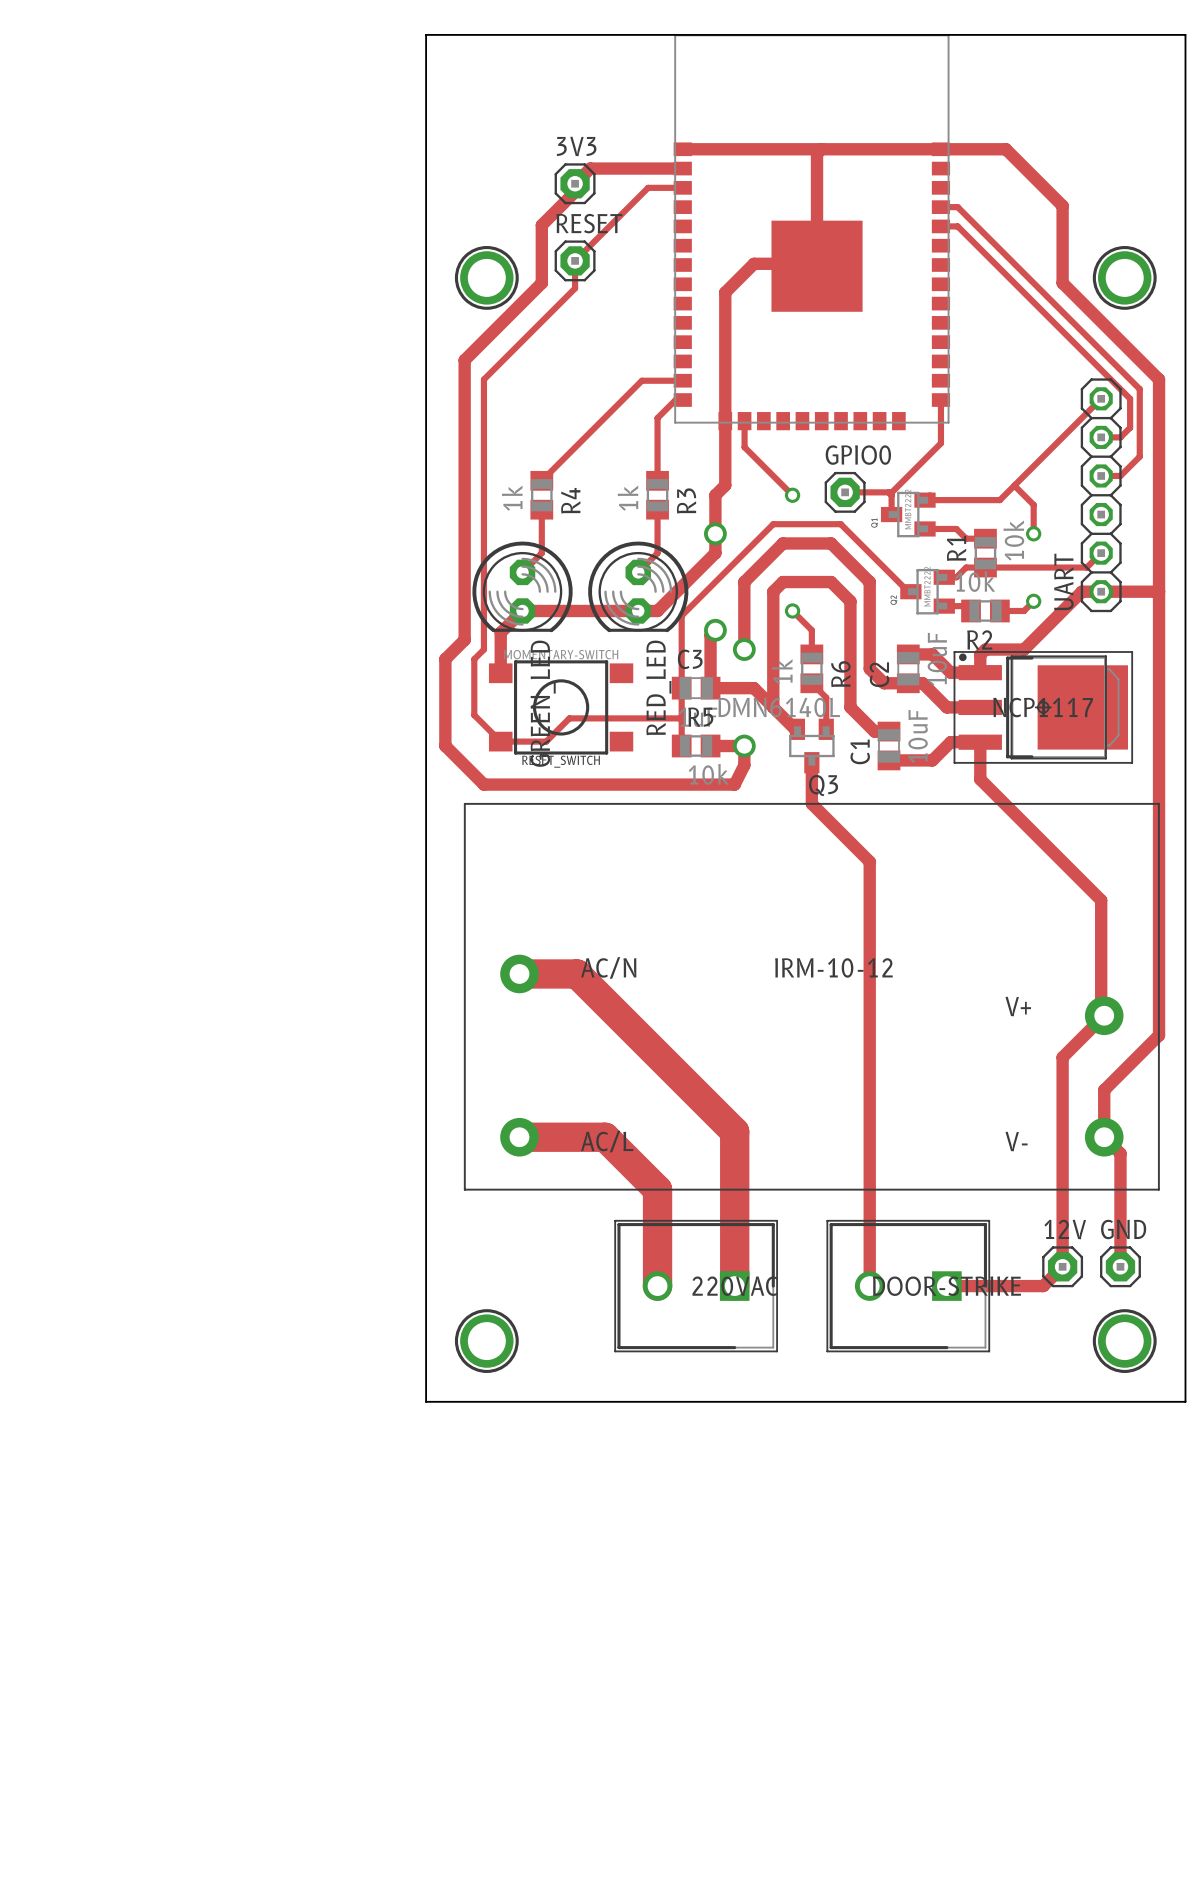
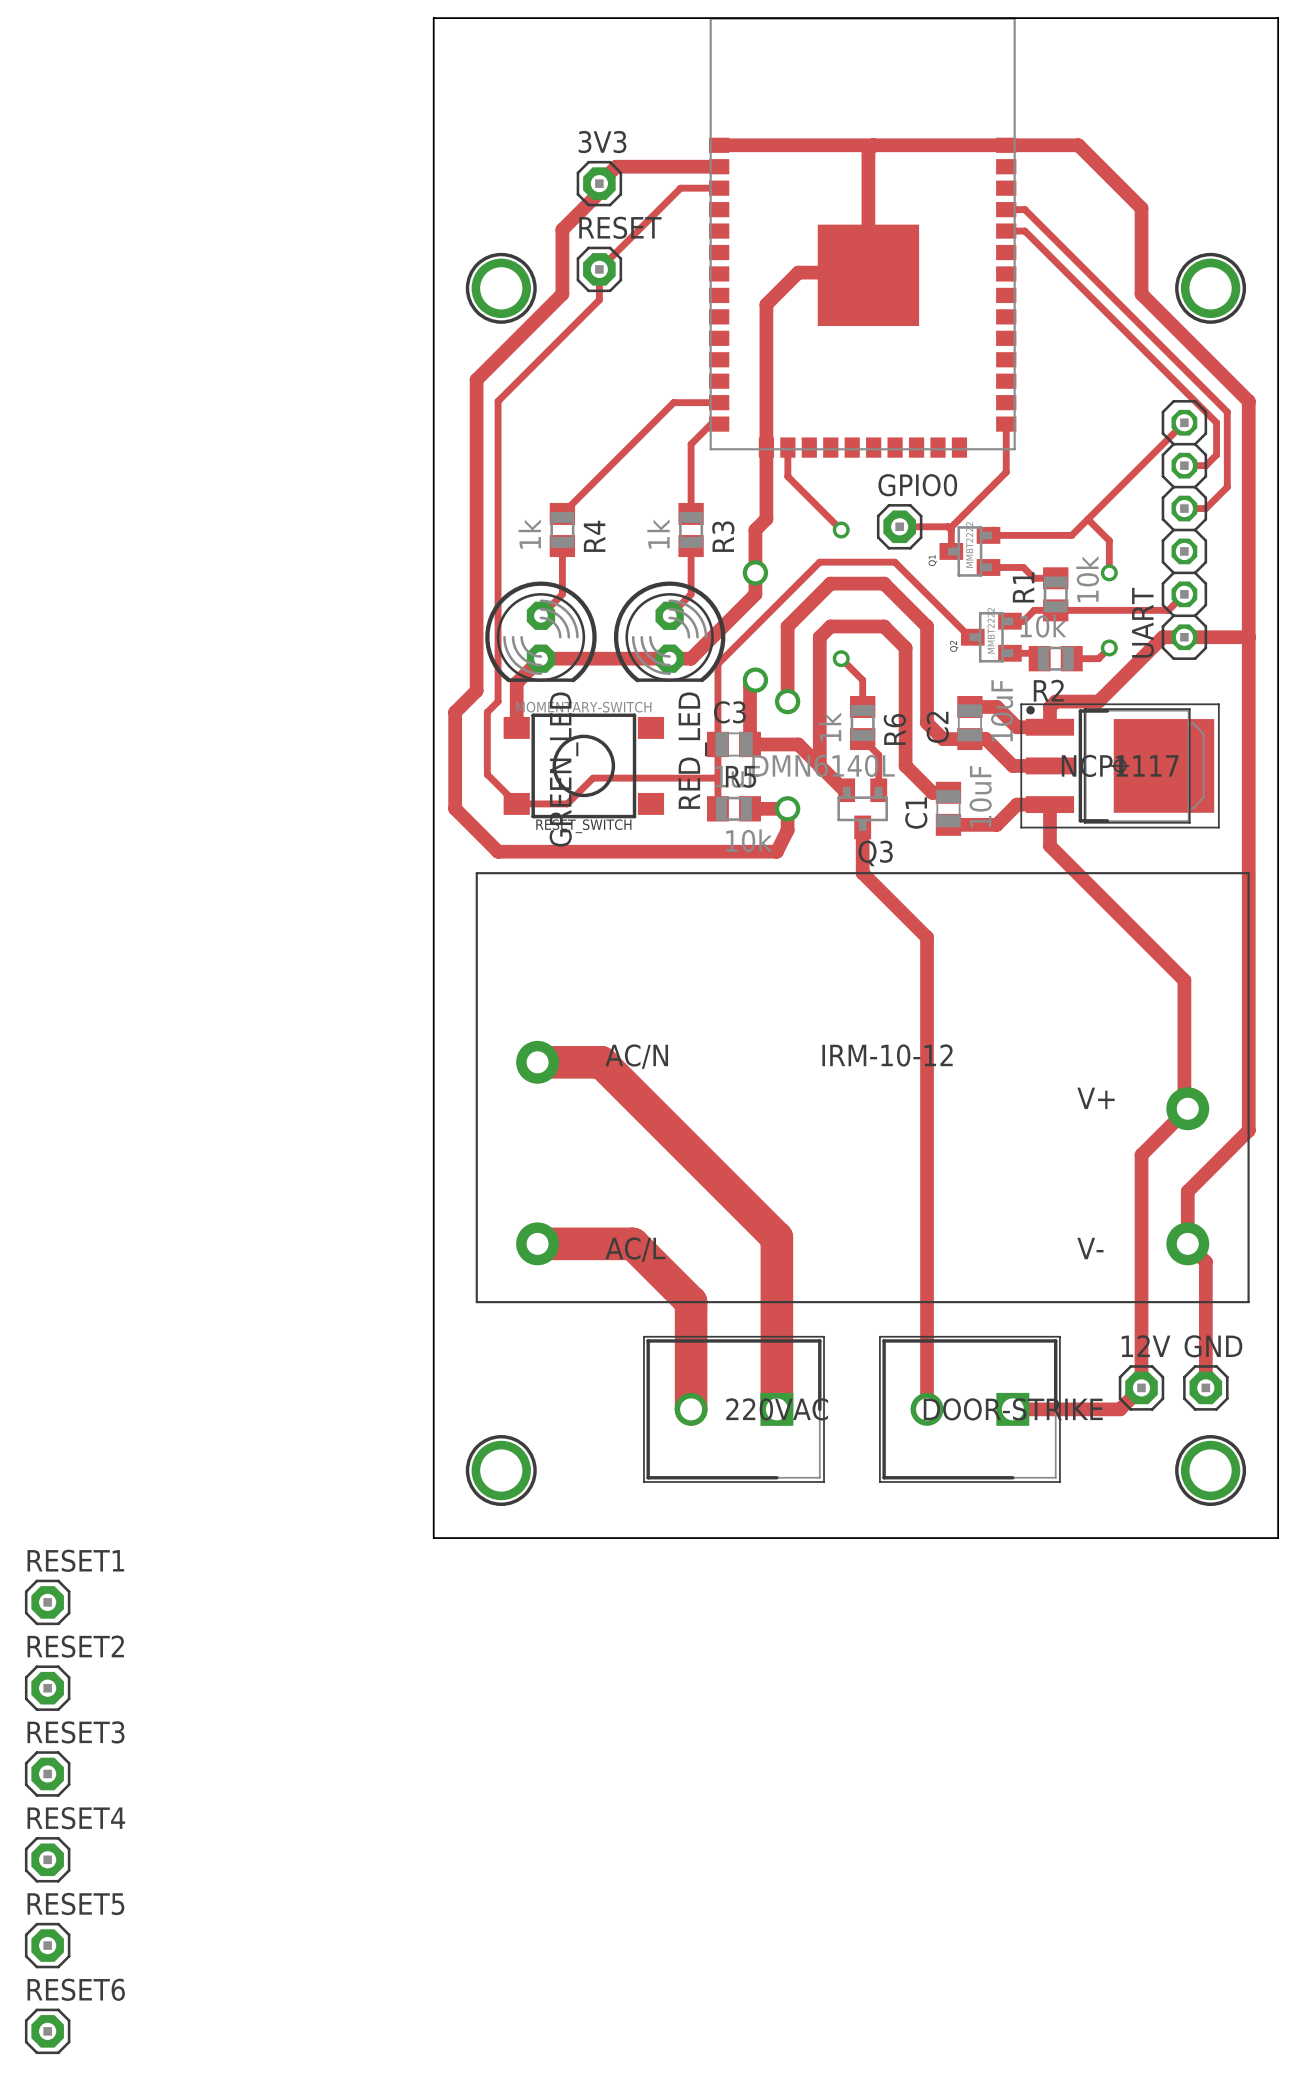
RESET1: none -> (47, 1602)
RESET2: none -> (47, 1688)
RESET3: none -> (47, 1773)
RESET4: none -> (47, 1859)
RESET5: none -> (47, 1945)
RESET6: none -> (47, 2031)

